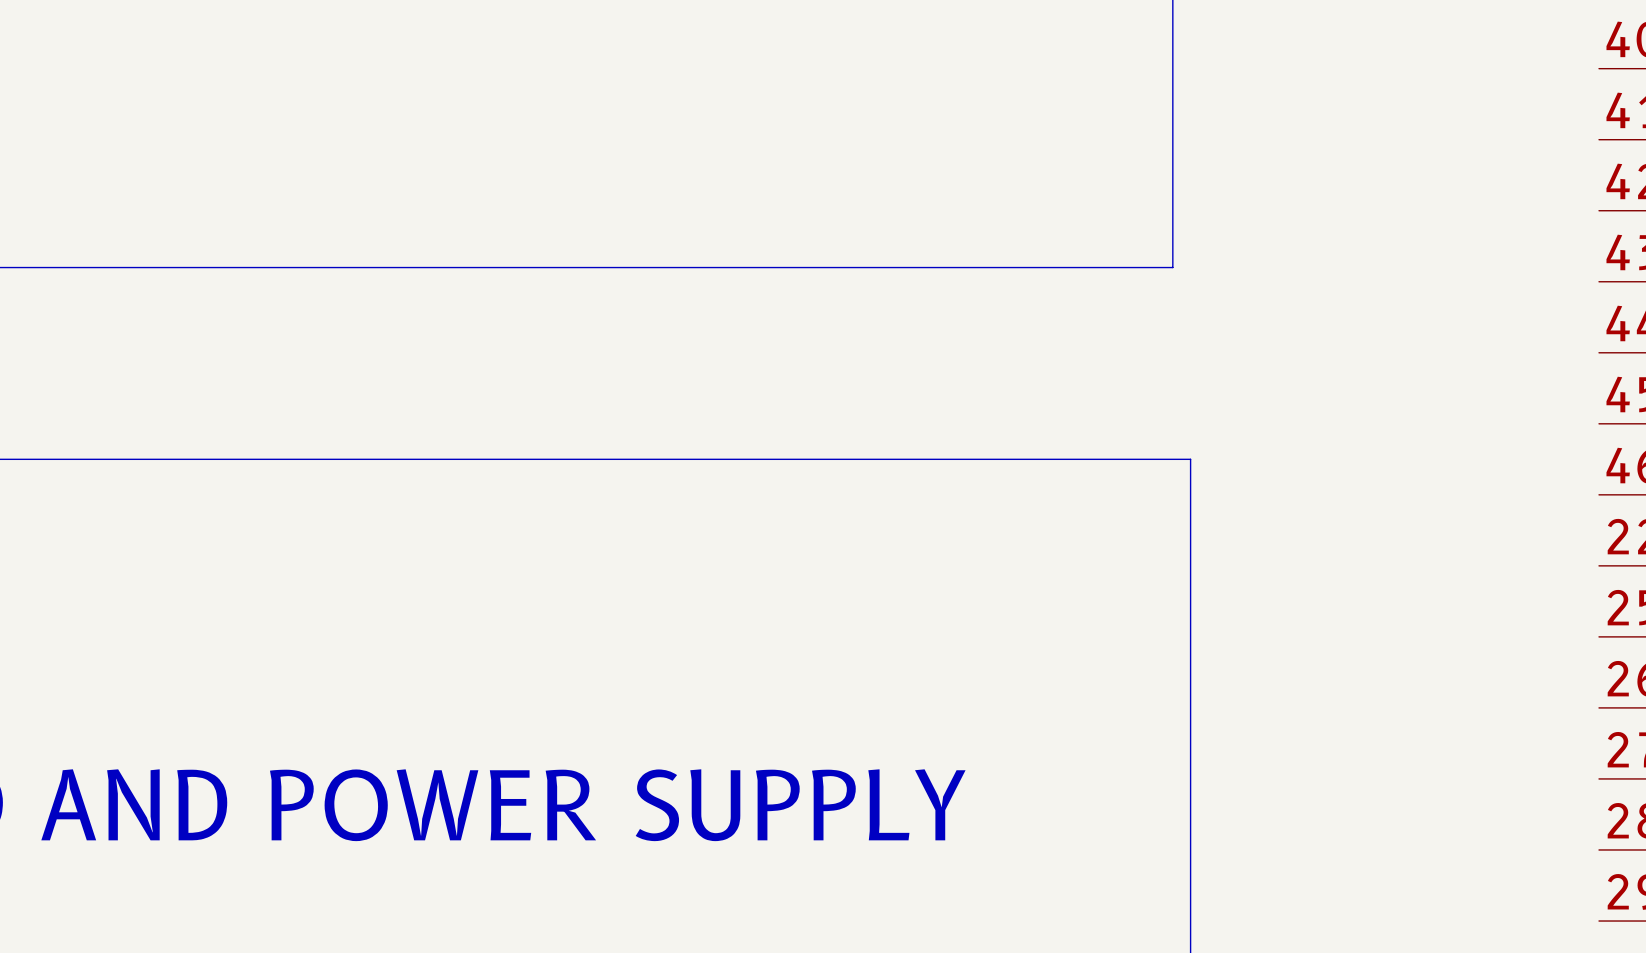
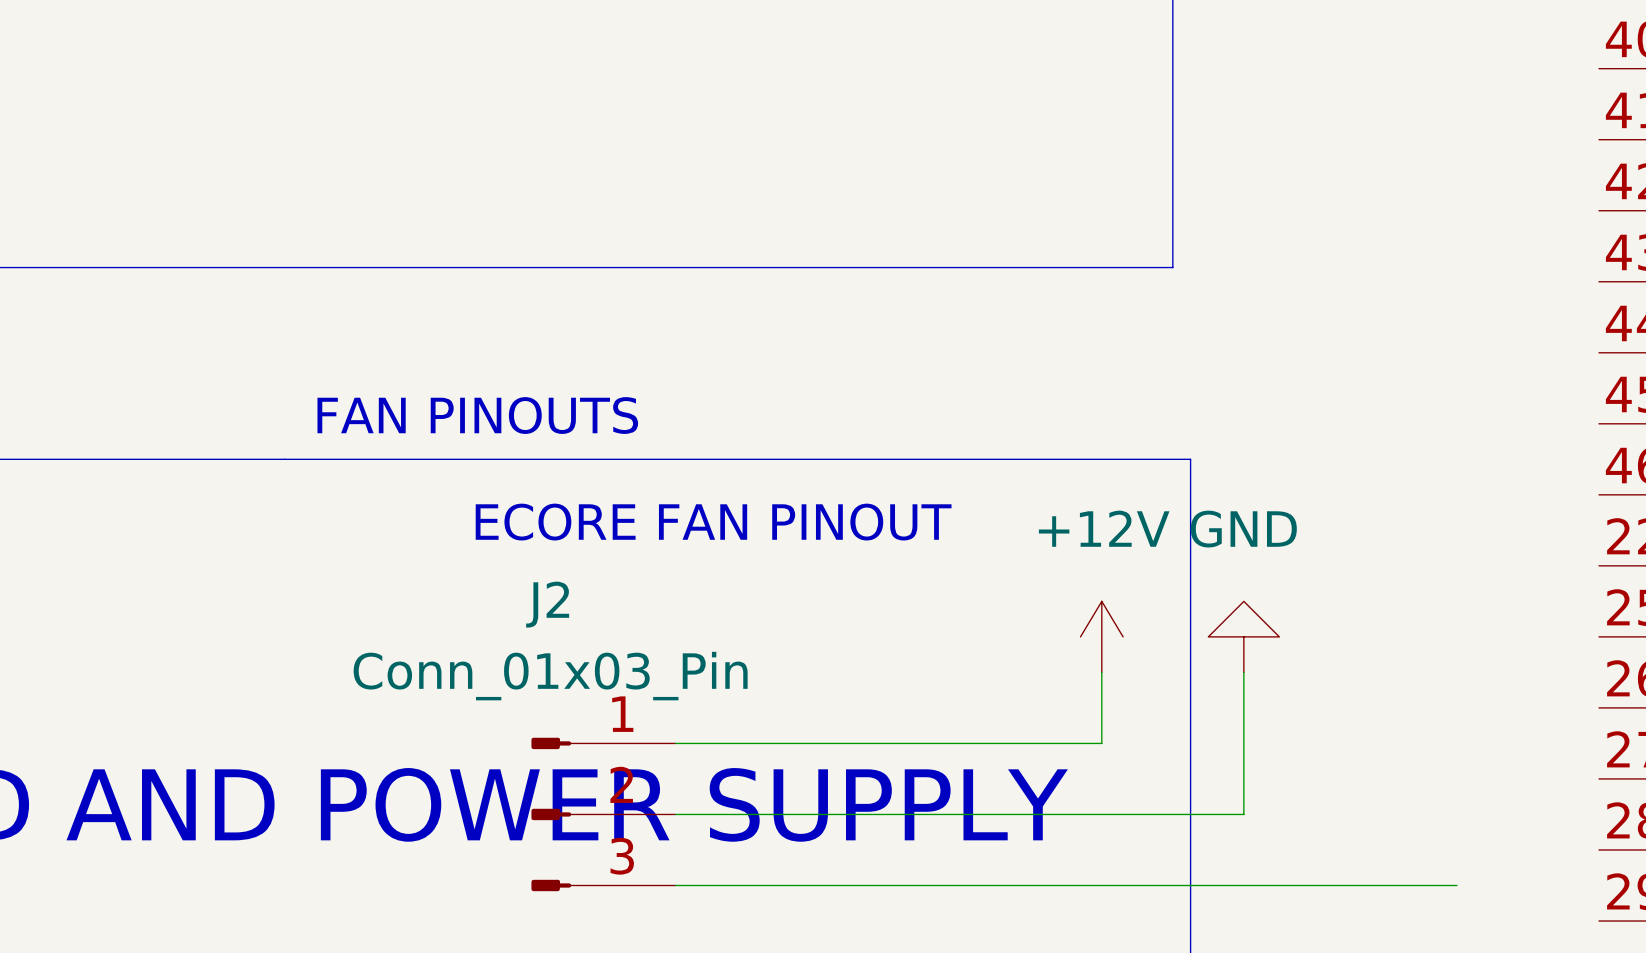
text: none -> FAN PINOUTS (477, 415)
text: none -> ECORE FAN PINOUT (713, 522)
power symbol: none -> +12V (1101, 636)
power symbol: none -> GND (1243, 636)
wire: none -> (1101, 672) (1101, 743) (675, 743)
wire: none -> (1243, 672) (1243, 814) (675, 814)
J2: none -> Conn_01x03_Pin (603, 814)
wire: none -> (675, 885) (1456, 885)

